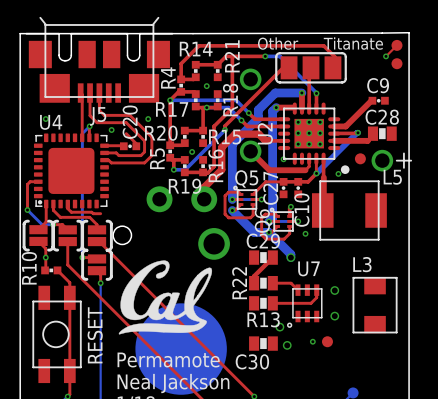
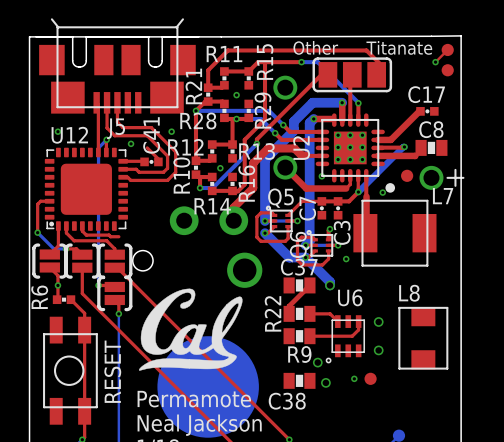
R14 name: R14 (196, 49) -> R11 (224, 54)
R21 name: R21 (232, 56) -> R15 (265, 62)
R4 name: R4 (168, 77) -> R21 (193, 86)
C9 name: C9 (378, 85) -> C17 (426, 94)
R18 name: R18 (230, 100) -> R29 (263, 110)
R17 name: R17 (172, 109) -> R28 (198, 121)
C28 name: C28 (382, 117) -> C8 (431, 129)
U4 name: U4 (51, 122) -> U12 (69, 135)
C20 name: C20 (130, 122) -> C41 (151, 135)
R20 name: R20 (161, 133) -> R12 (185, 147)
R15 name: R15 (225, 137) -> R13 (257, 151)
R5 name: R5 (157, 158) -> R10 (181, 175)
L5 name: L5 (392, 177) -> L7 (443, 196)
R19 name: R19 (185, 186) -> R14 (212, 206)
C27 name: C27 (270, 188) -> C7 (307, 208)
C10 name: C10 (301, 210) -> C3 (342, 232)
C29 name: C29 (263, 241) -> C37 (299, 267)
L3 name: L3 (362, 264) -> L8 (409, 293)
R10 name: R10 (29, 268) -> R6 (39, 297)
U7 name: U7 (308, 268) -> U6 (350, 297)
R13 name: R13 (263, 319) -> R9 (299, 354)
C30 name: C30 (252, 361) -> C38 (287, 401)

